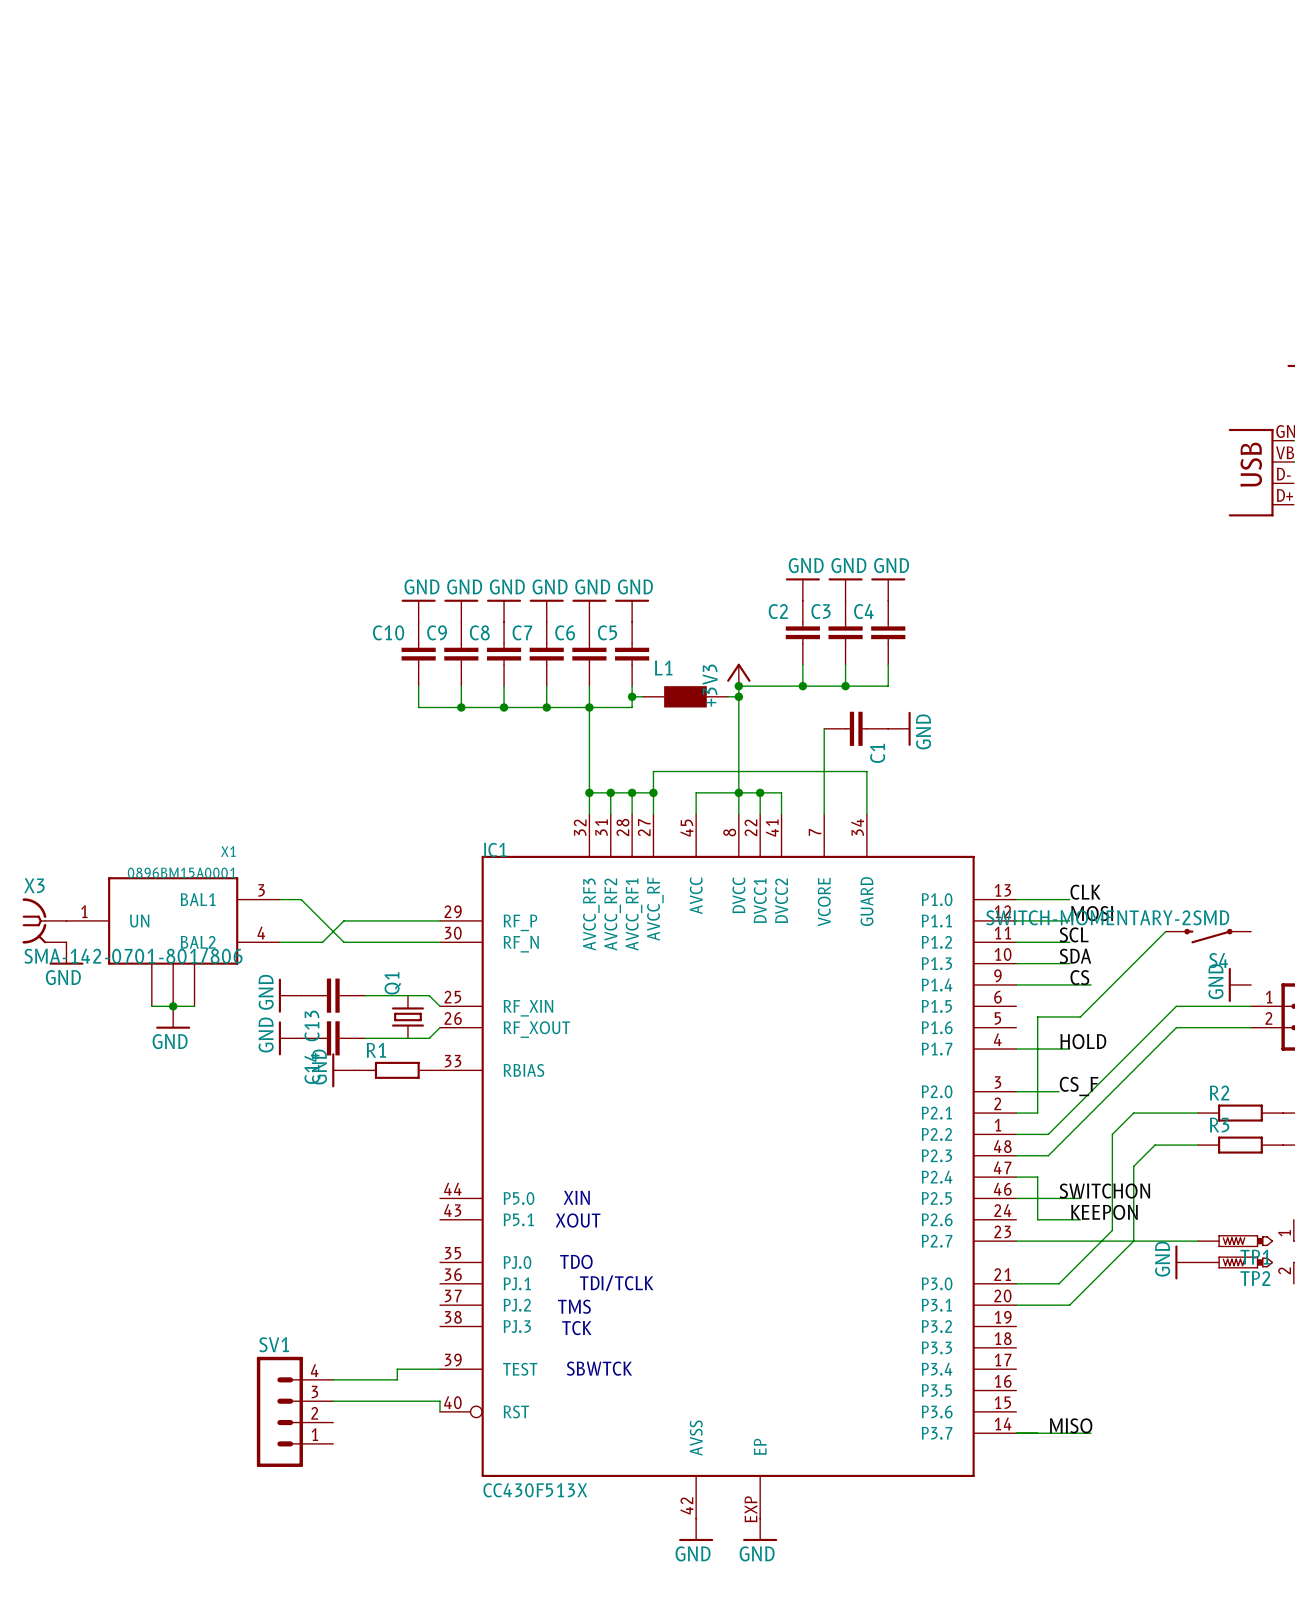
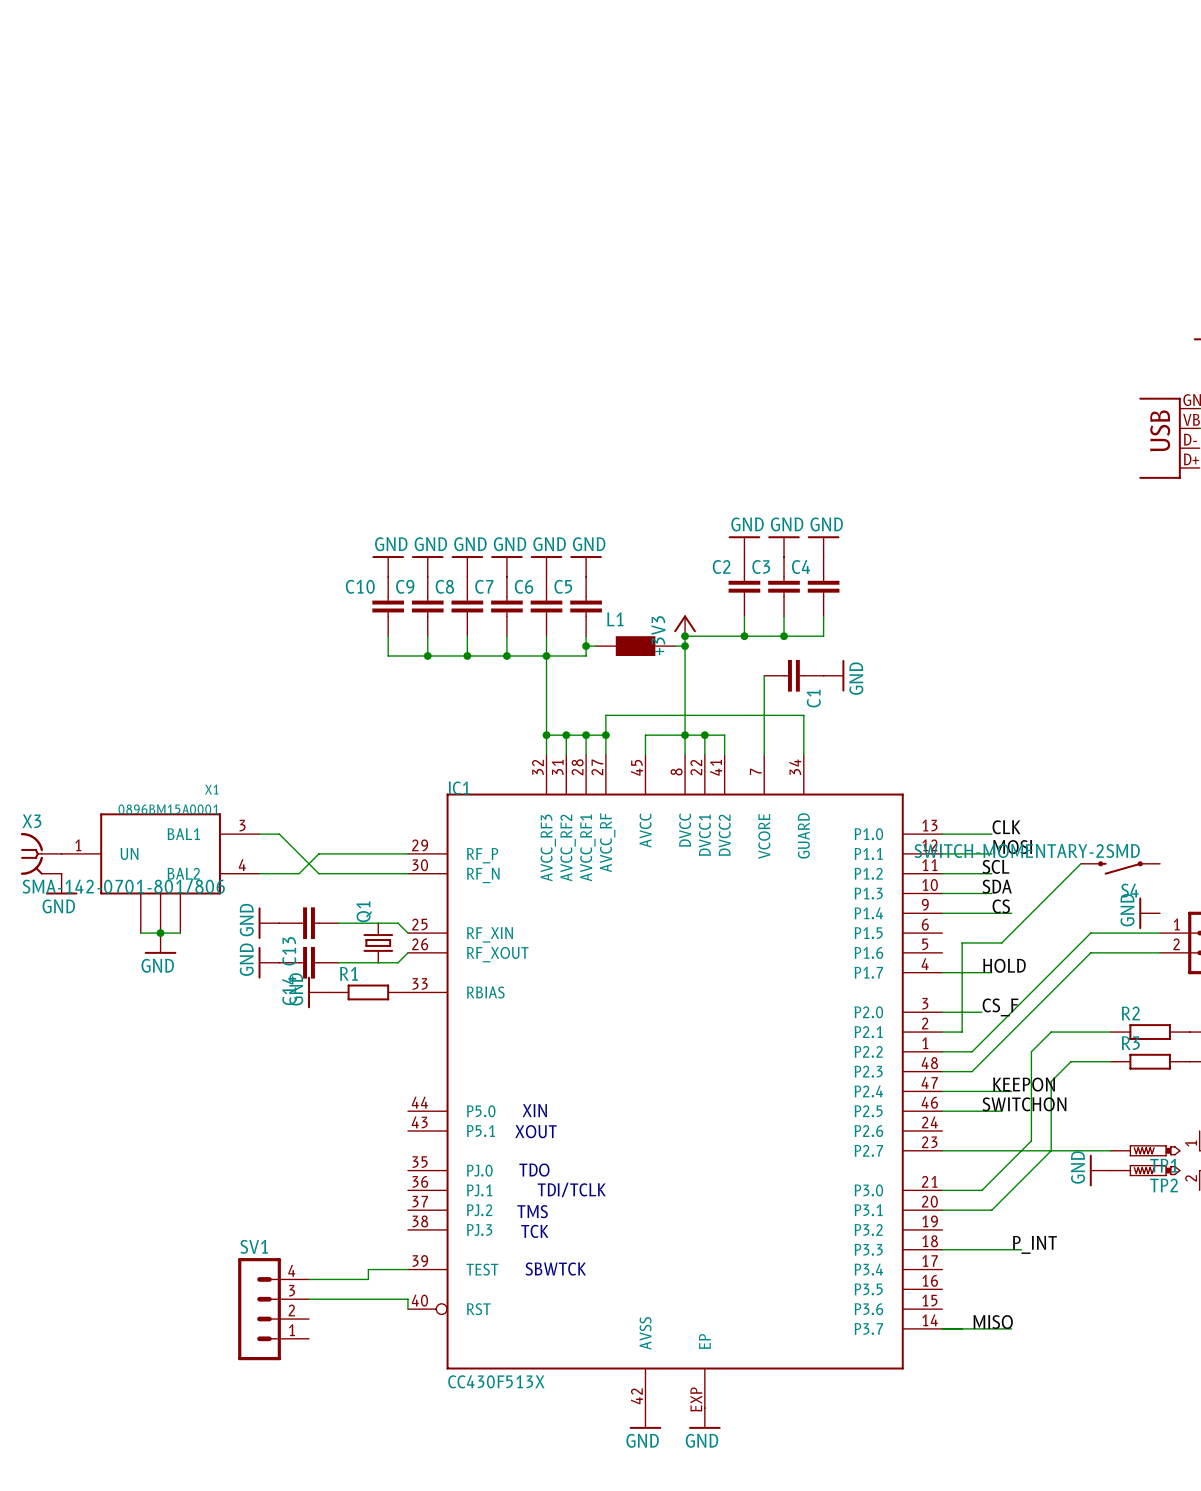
wire: (1037, 1177) (1037, 1219) (1080, 1219) -> (962, 1091) (1011, 1091)
label position: KEEPON (1104, 1212) -> KEEPON (1024, 1084)
label: none -> P_INT (1034, 1244)
wire: none -> (942, 1249) (1021, 1249)

